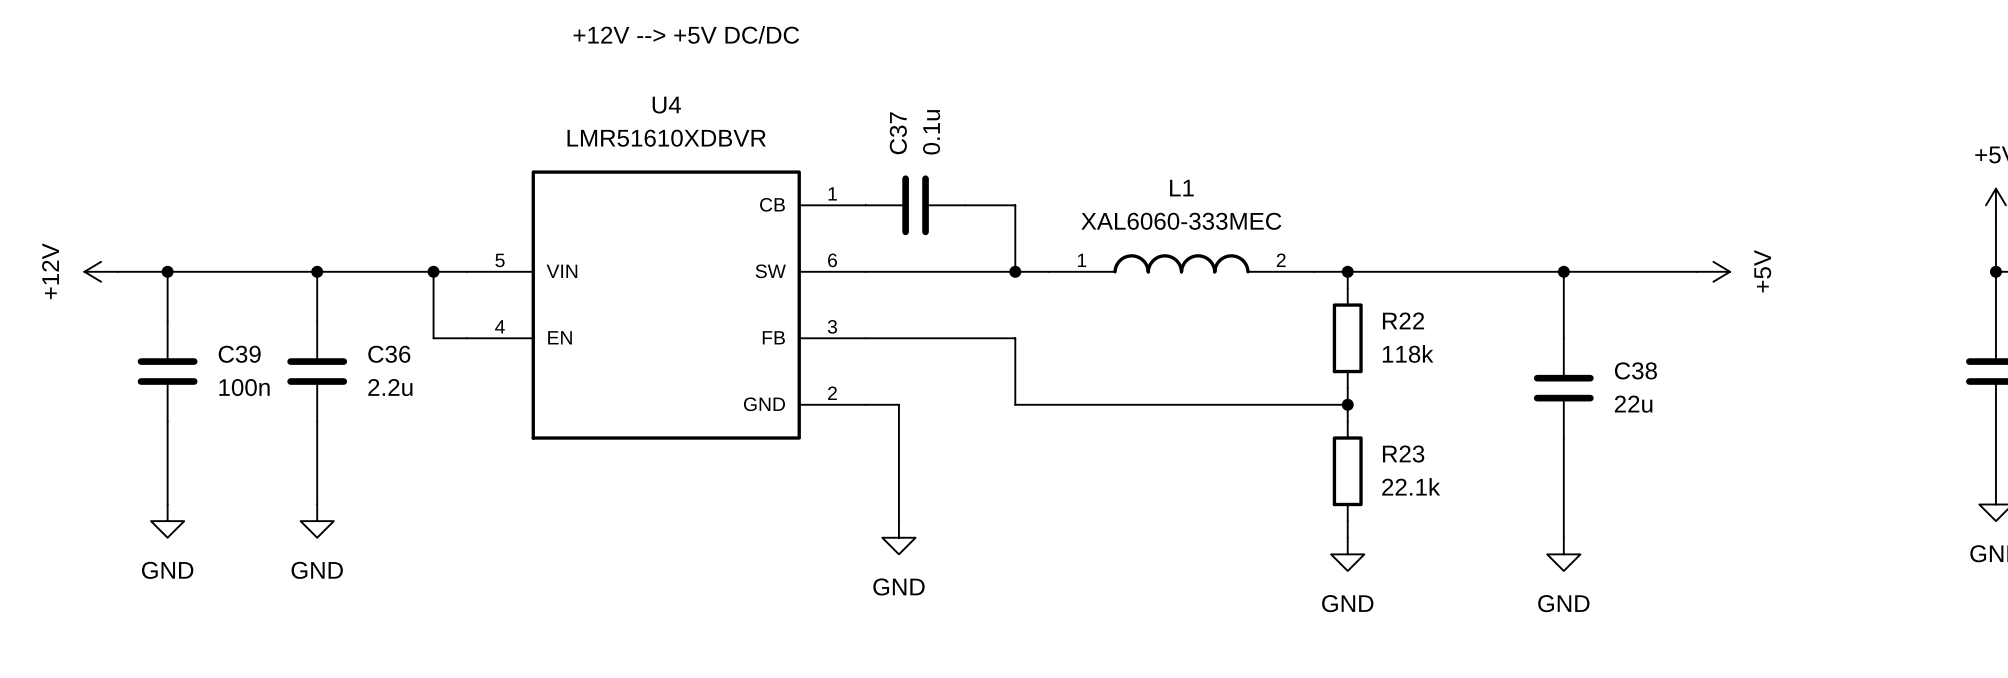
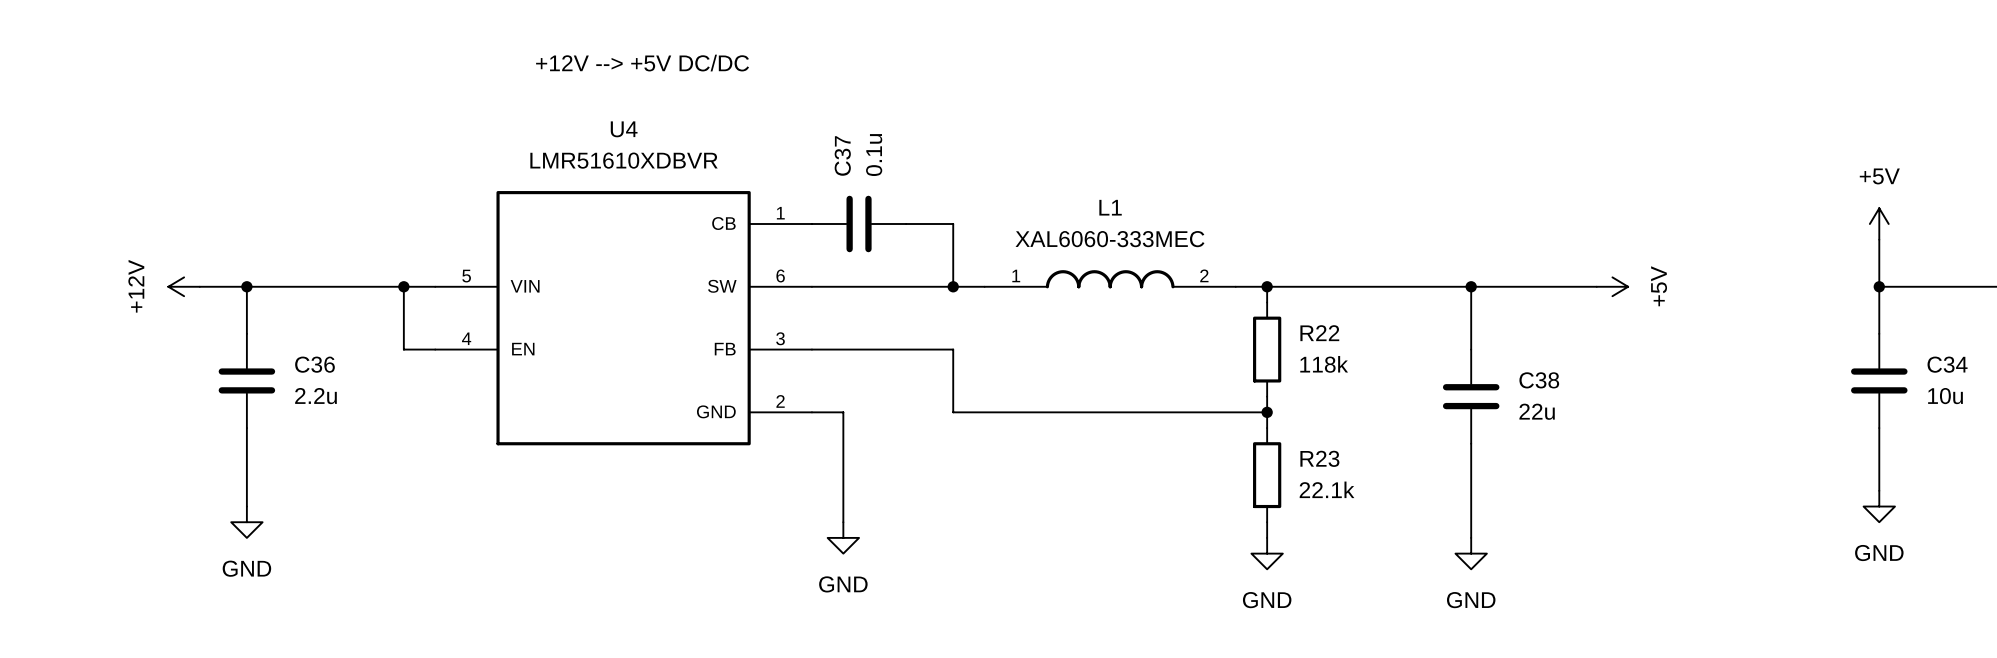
power symbol position: +12V (101, 271) -> +12V (184, 286)
wire: (117, 271) (217, 271) -> none
wire: (167, 271) (167, 321) -> none
junction: (167, 271) -> none
junction: none -> (246, 286)
wire: (317, 271) (317, 321) -> (246, 286) (246, 333)
junction: (317, 271) -> none
C39: 100n (167, 371) -> none
C36 position: (317, 371) -> (246, 380)
wire: (167, 421) (167, 504) -> none
wire: (317, 421) (317, 504) -> (246, 428) (246, 506)
power symbol: GND (167, 521) -> none
power symbol: none -> GND (246, 522)
power symbol: GND (317, 521) -> none

